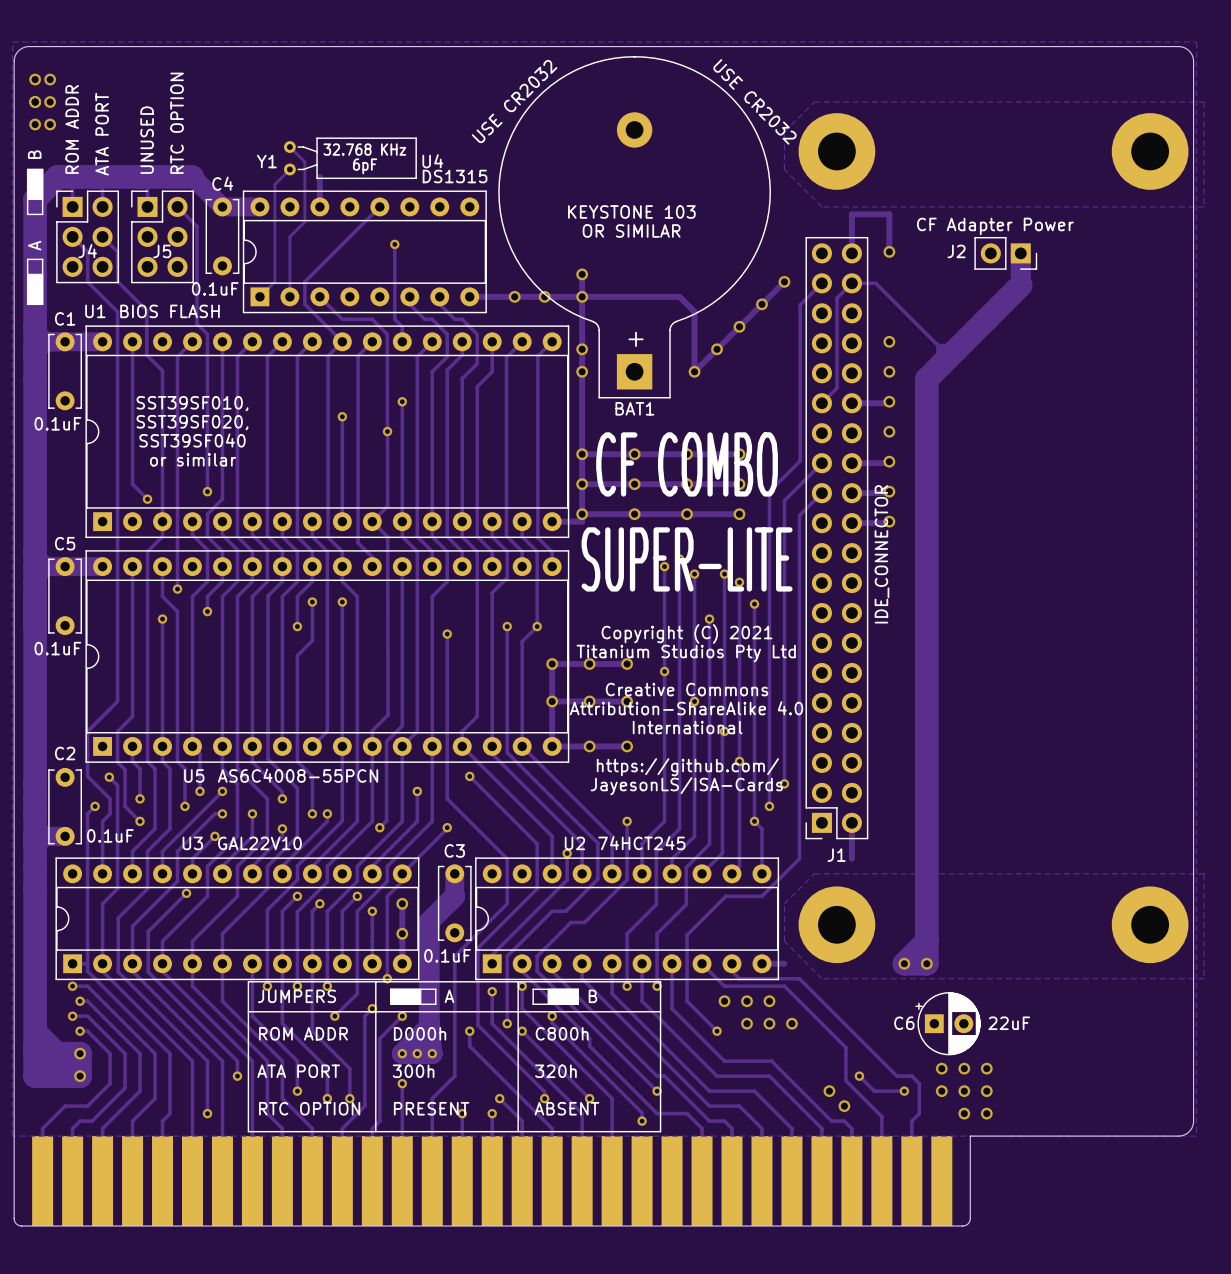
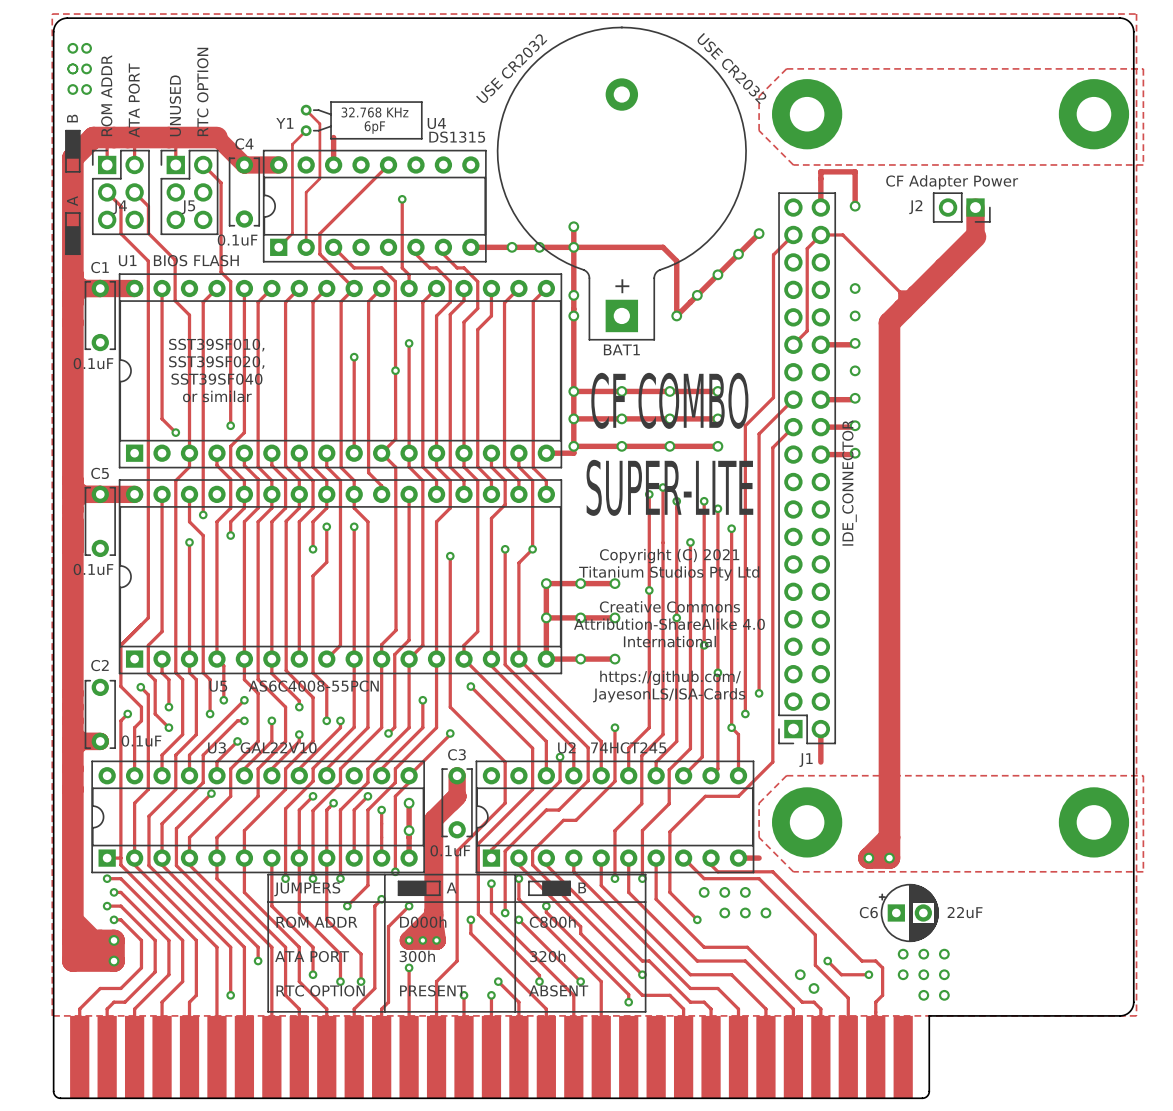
text: KEYSTONE 103 (631, 211) -> none
text: OR SIMILAR (631, 230) -> none

